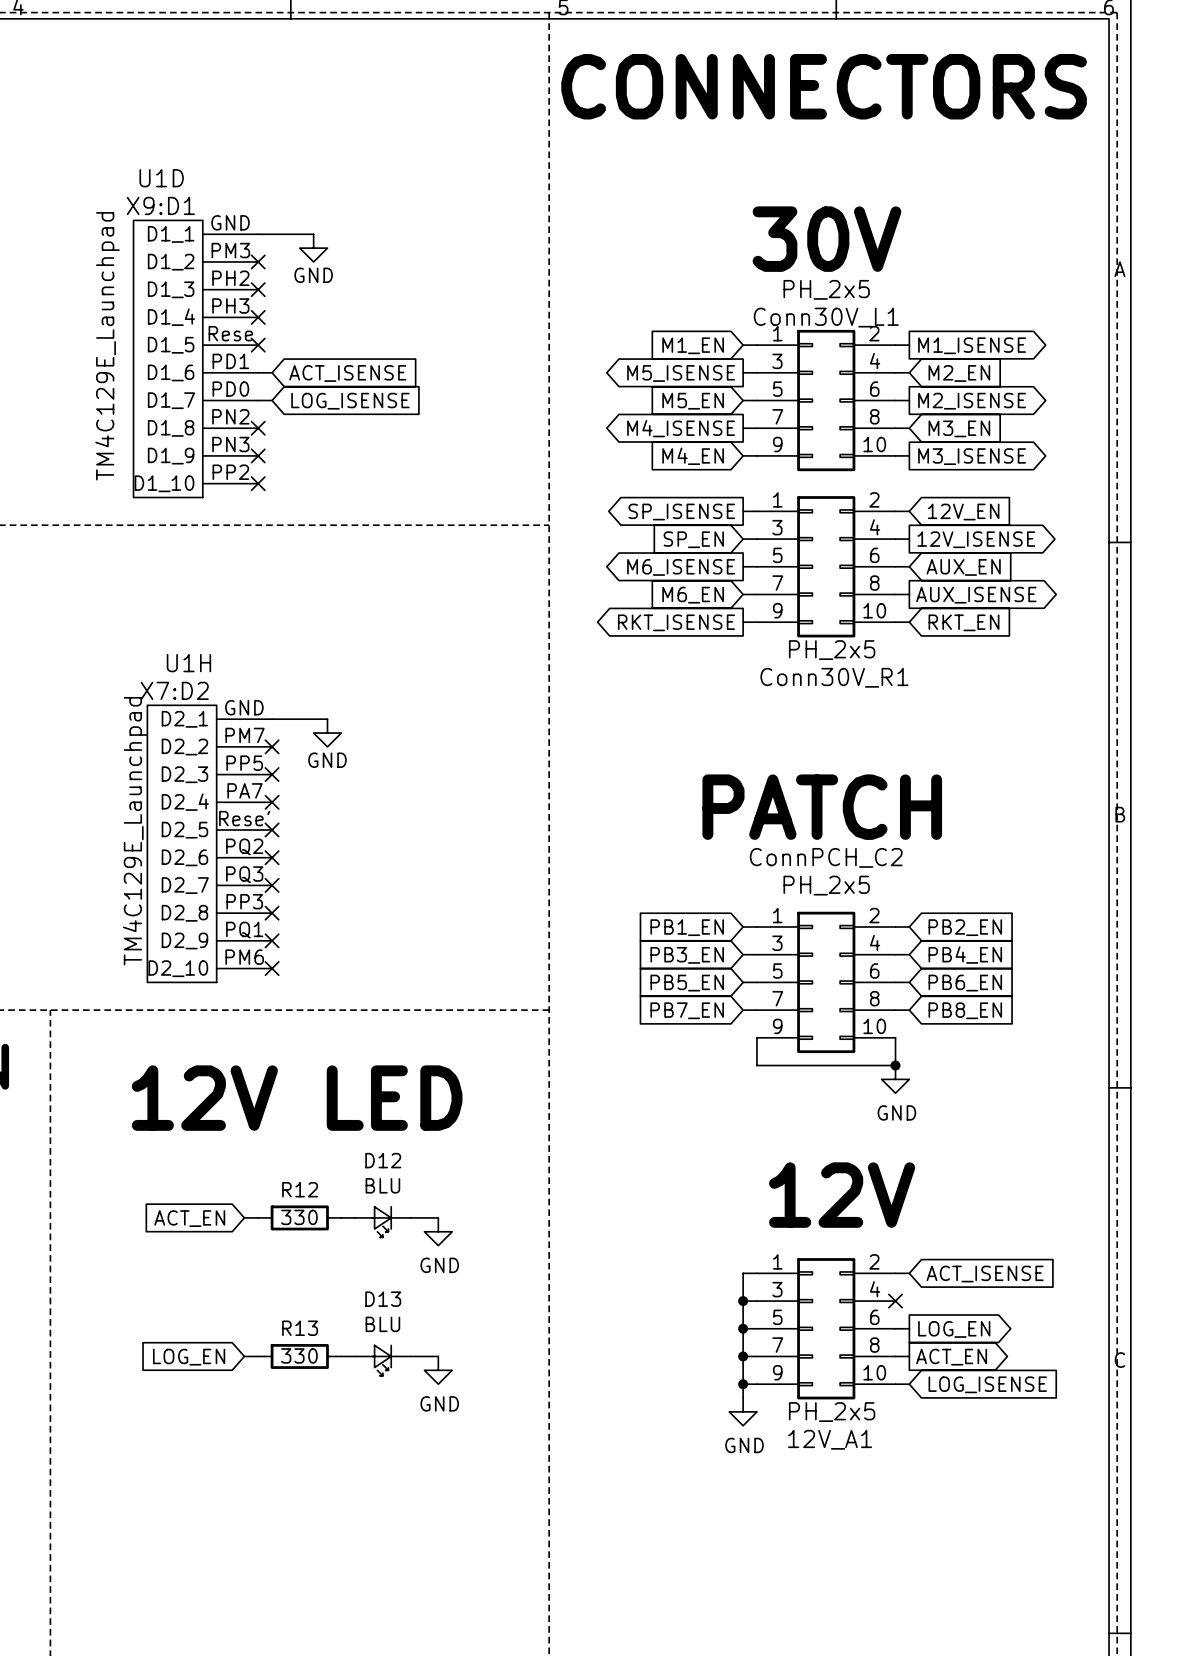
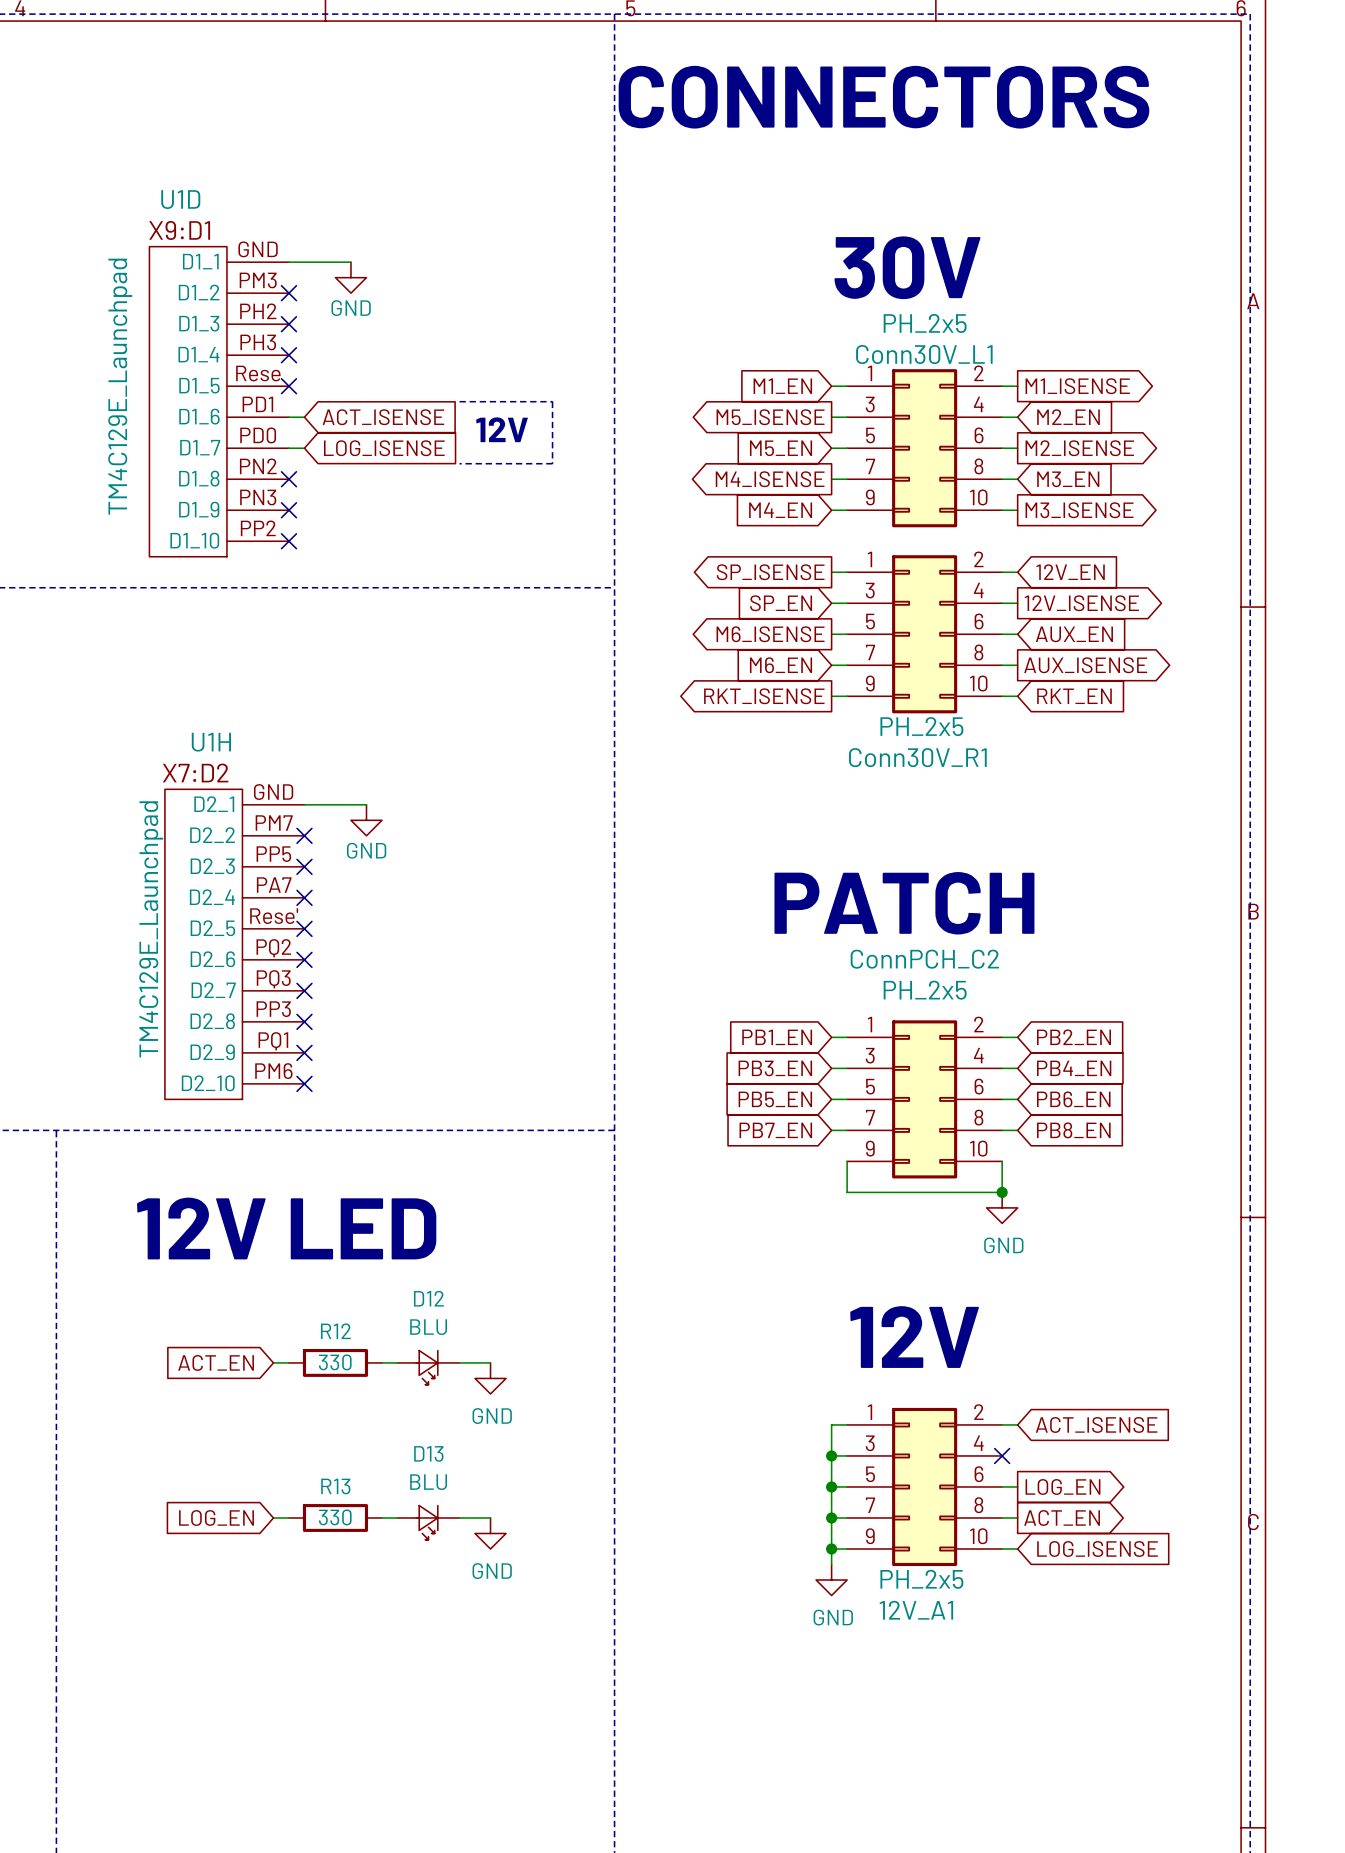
line: none -> (459, 401) (552, 401) (552, 463) (459, 463)
text: none -> 12V (502, 429)

